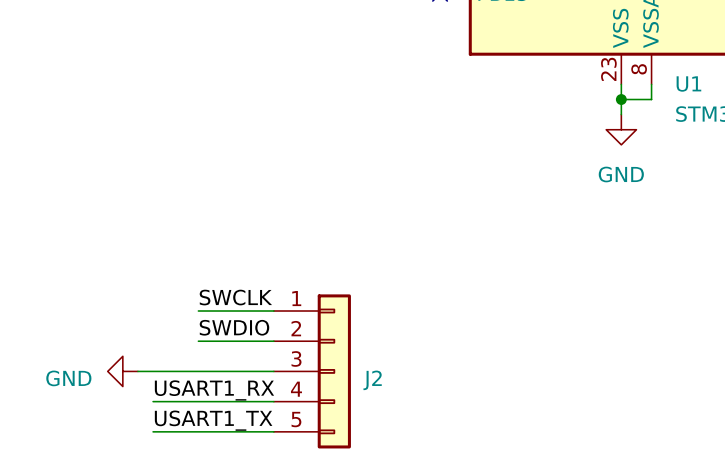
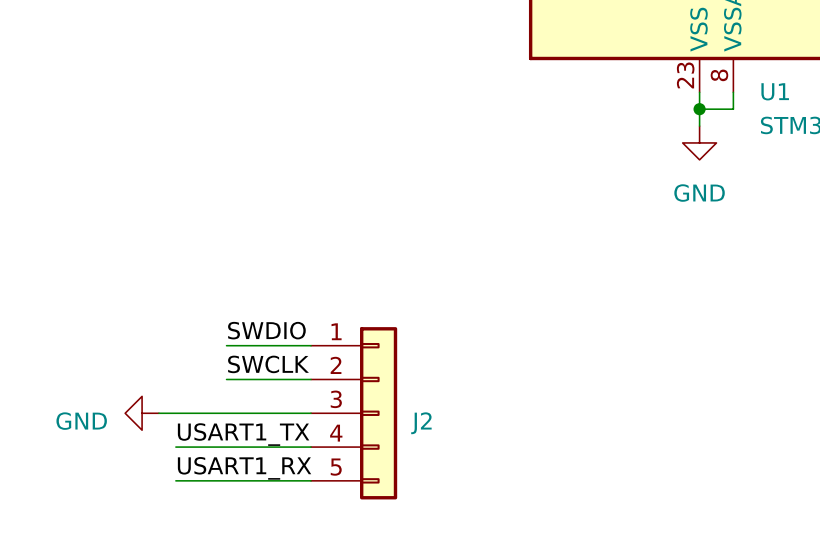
label: SWCLK (235, 297) -> SWDIO (266, 330)
label: SWDIO (234, 327) -> SWCLK (268, 364)
label: USART1_RX (214, 390) -> USART1_TX (243, 434)
label: USART1_TX (213, 420) -> USART1_RX (244, 468)

